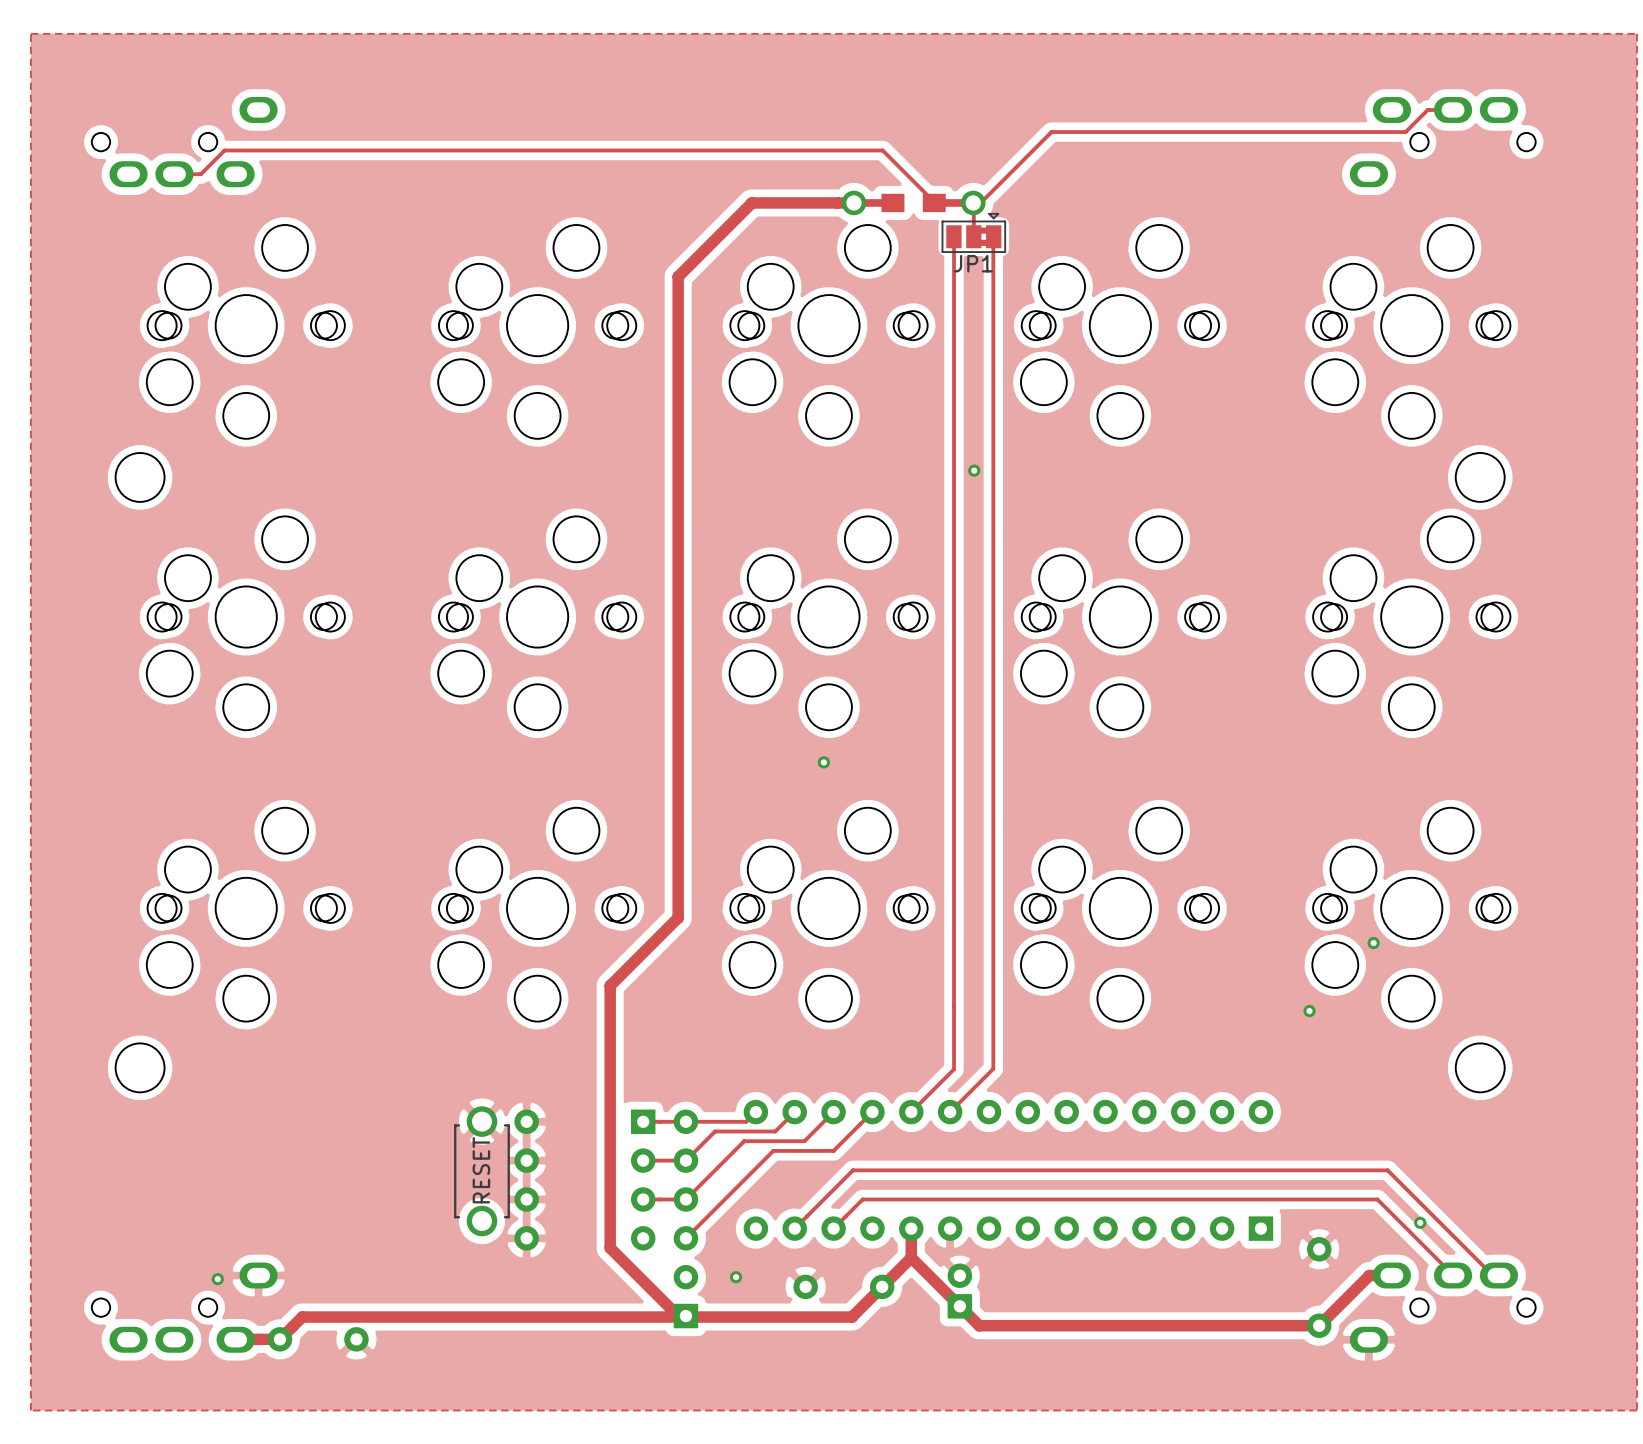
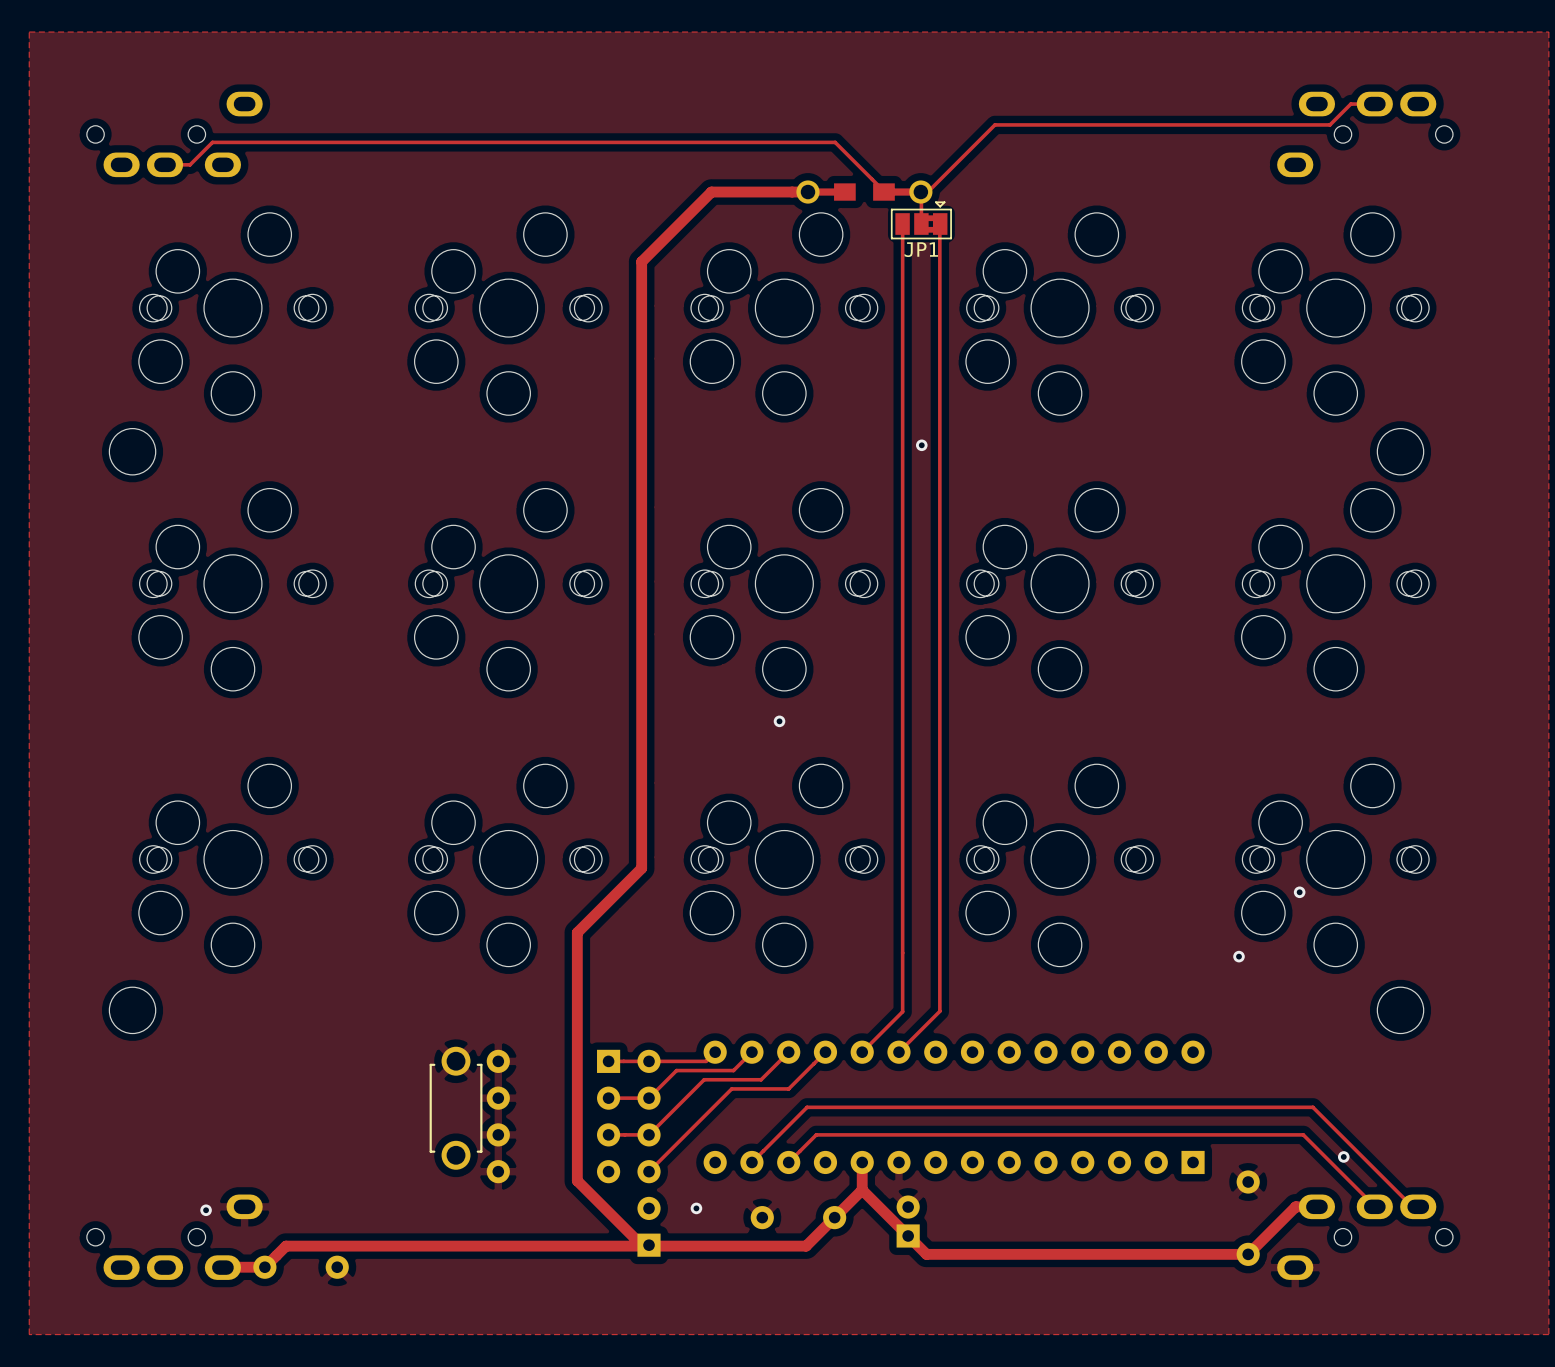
part text: RESET (481, 1170) -> none

